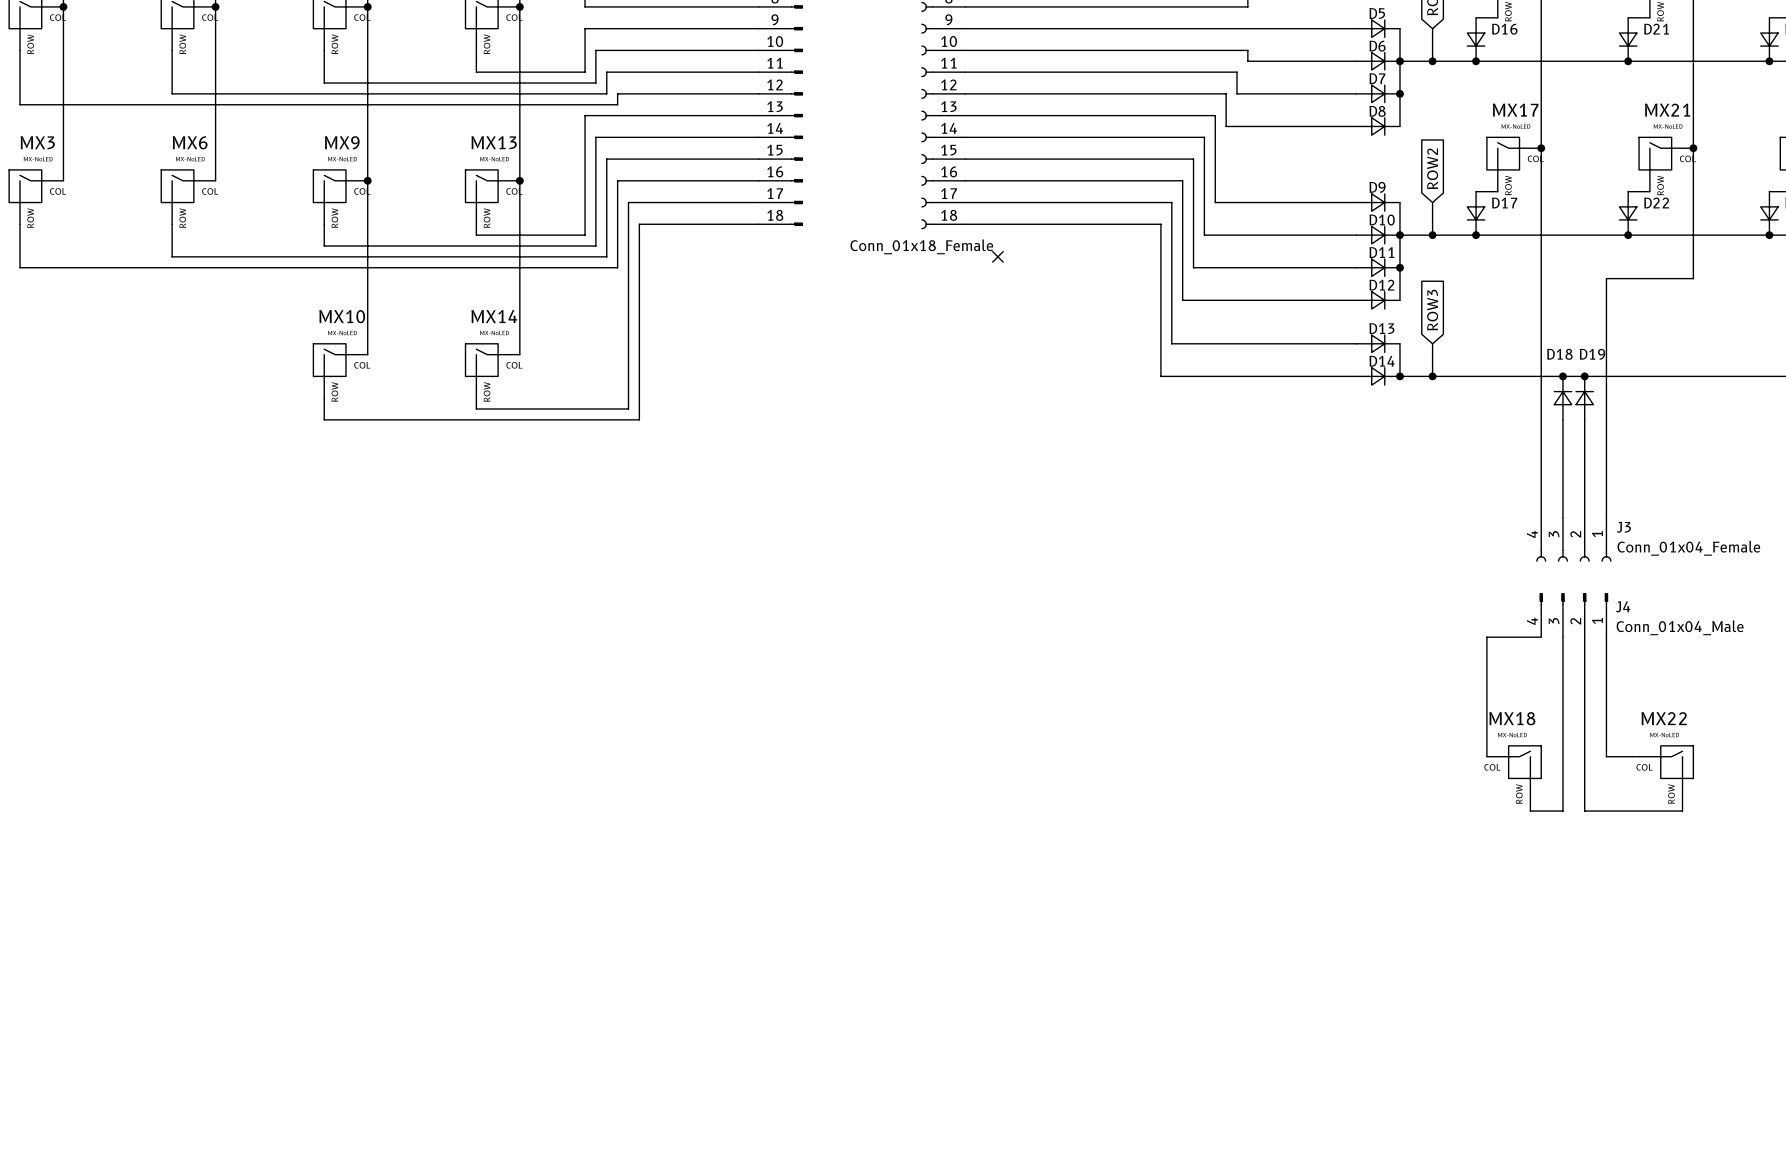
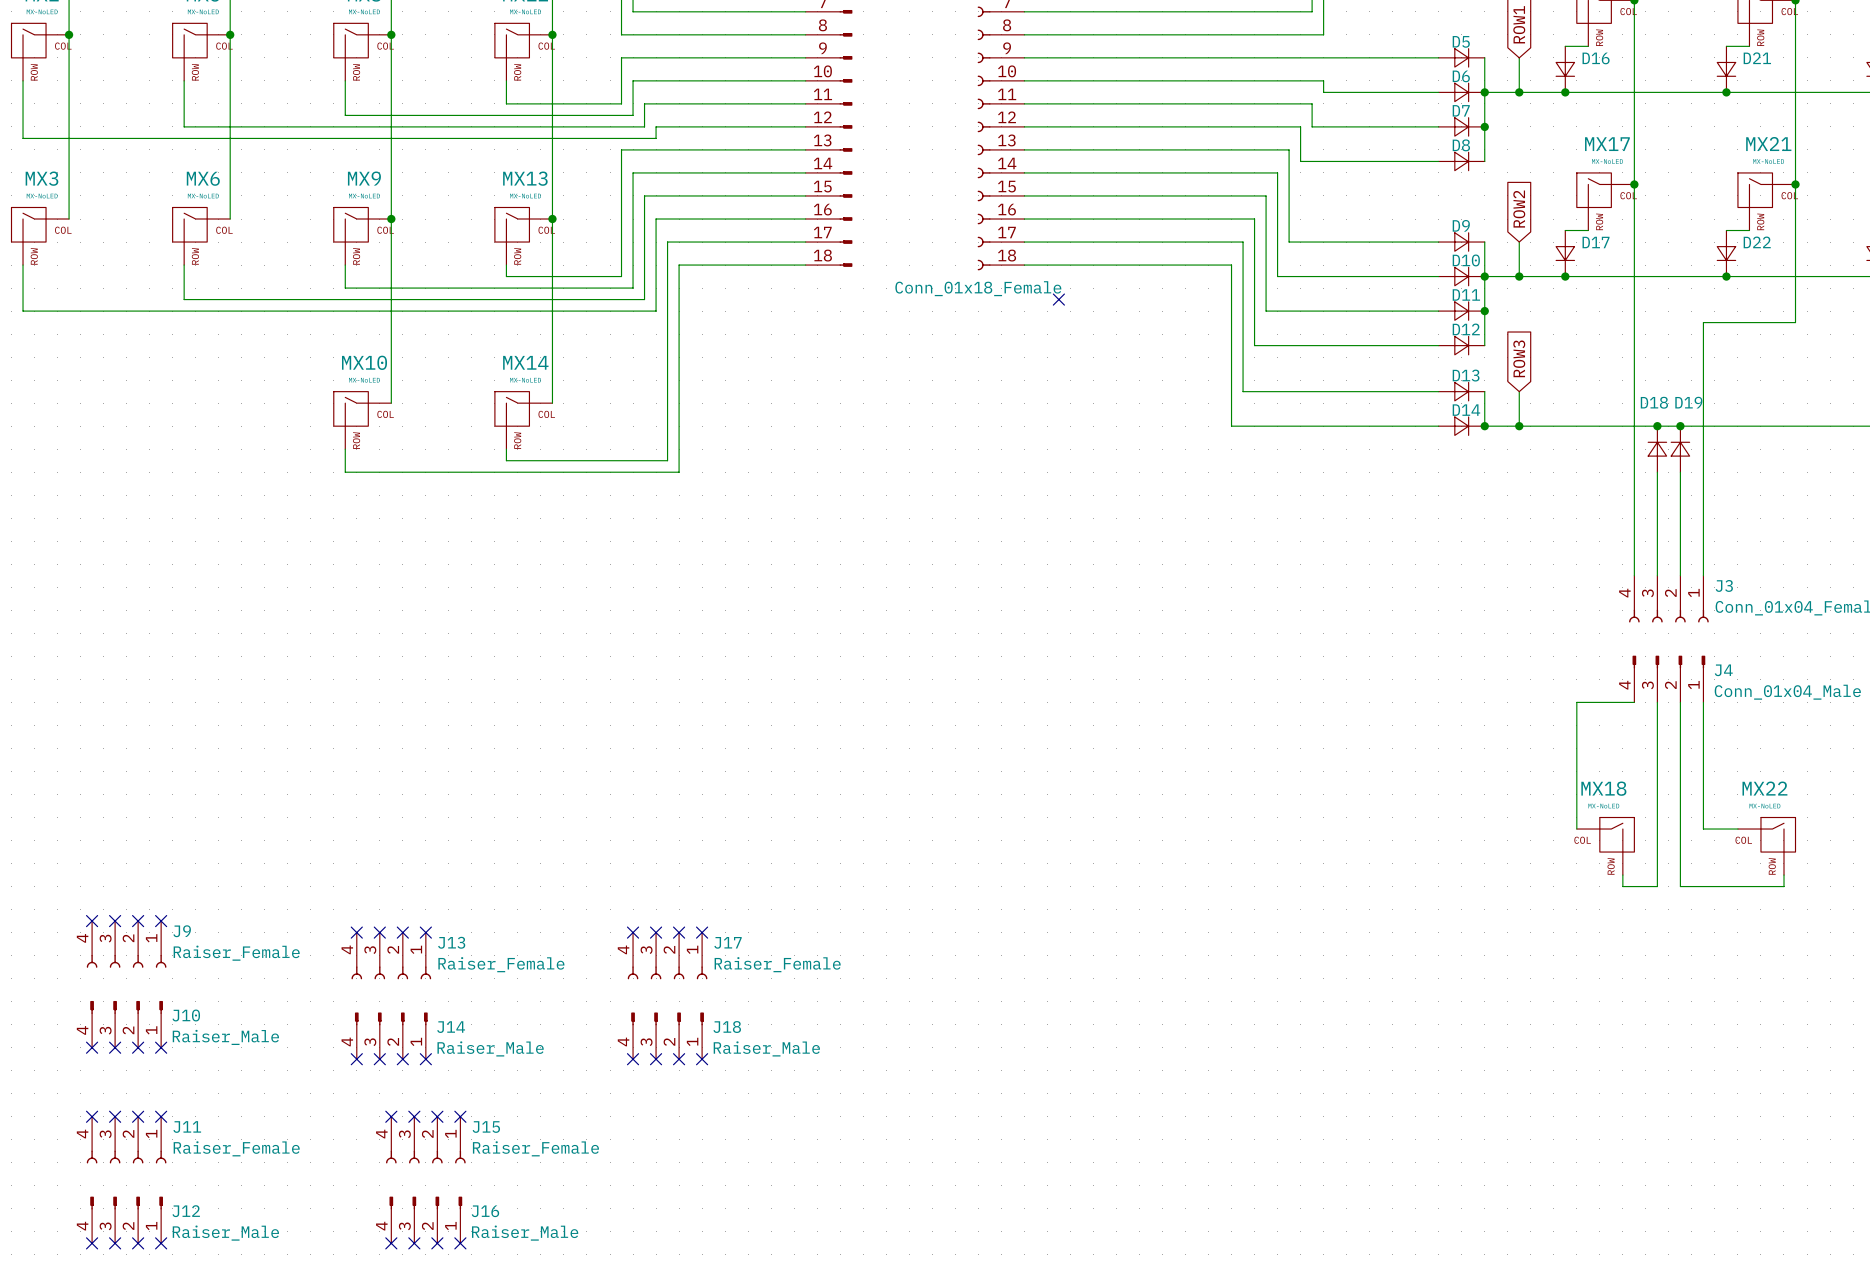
no-connect mark: none -> (92, 921)
no-connect mark: none -> (115, 921)
no-connect mark: none -> (138, 921)
no-connect mark: none -> (161, 921)
no-connect mark: none -> (356, 932)
no-connect mark: none -> (379, 932)
no-connect mark: none -> (402, 932)
no-connect mark: none -> (425, 932)
no-connect mark: none -> (633, 932)
no-connect mark: none -> (656, 932)
no-connect mark: none -> (679, 932)
no-connect mark: none -> (702, 932)
J9: none -> Raiser_Female (126, 944)
J13: none -> Raiser_Female (391, 955)
J17: none -> Raiser_Female (667, 955)
J10: none -> Raiser_Male (126, 1024)
J14: none -> Raiser_Male (391, 1035)
J18: none -> Raiser_Male (667, 1035)
no-connect mark: none -> (92, 1047)
no-connect mark: none -> (115, 1047)
no-connect mark: none -> (138, 1047)
no-connect mark: none -> (161, 1047)
no-connect mark: none -> (356, 1059)
no-connect mark: none -> (379, 1059)
no-connect mark: none -> (402, 1059)
no-connect mark: none -> (425, 1059)
no-connect mark: none -> (633, 1059)
no-connect mark: none -> (656, 1059)
no-connect mark: none -> (679, 1059)
no-connect mark: none -> (702, 1059)
no-connect mark: none -> (92, 1116)
no-connect mark: none -> (115, 1116)
no-connect mark: none -> (138, 1116)
no-connect mark: none -> (161, 1116)
no-connect mark: none -> (391, 1116)
no-connect mark: none -> (414, 1116)
no-connect mark: none -> (437, 1116)
no-connect mark: none -> (460, 1116)
J11: none -> Raiser_Female (126, 1140)
J15: none -> Raiser_Female (425, 1140)
J12: none -> Raiser_Male (126, 1220)
J16: none -> Raiser_Male (425, 1220)
no-connect mark: none -> (92, 1243)
no-connect mark: none -> (115, 1243)
no-connect mark: none -> (138, 1243)
no-connect mark: none -> (161, 1243)
no-connect mark: none -> (391, 1243)
no-connect mark: none -> (414, 1243)
no-connect mark: none -> (437, 1243)
no-connect mark: none -> (460, 1243)

